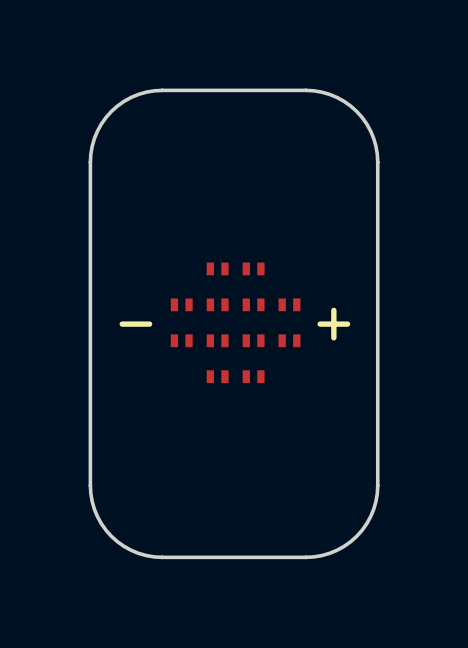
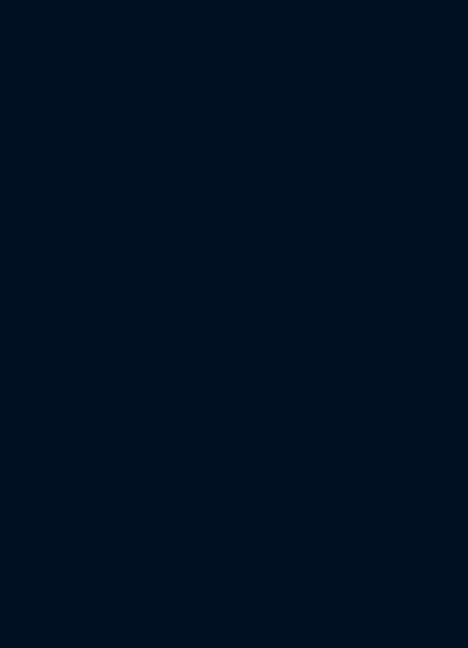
board edge: (162, 90) (305, 90) (321, 92) (337, 97) (356, 111) (366, 124) (373, 138) (377, 162) (377, 493) (373, 509) (362, 530) (344, 546) (329, 553) (305, 557) (162, 557) (146, 555) (131, 550) (117, 541) (106, 530) (94, 509) (90, 485) (90, 154) (97, 131) (111, 111) (131, 97) (146, 92) (162, 90) -> none
part: (217, 268) -> none
part: (253, 268) -> none
part: (181, 304) -> none
part: (217, 304) -> none
part: (253, 304) -> none
part: (289, 304) -> none
text: - (135, 324) -> none
text: + (333, 324) -> none
part: (181, 340) -> none
part: (217, 340) -> none
part: (253, 340) -> none
part: (289, 340) -> none
part: (217, 376) -> none
part: (253, 376) -> none

